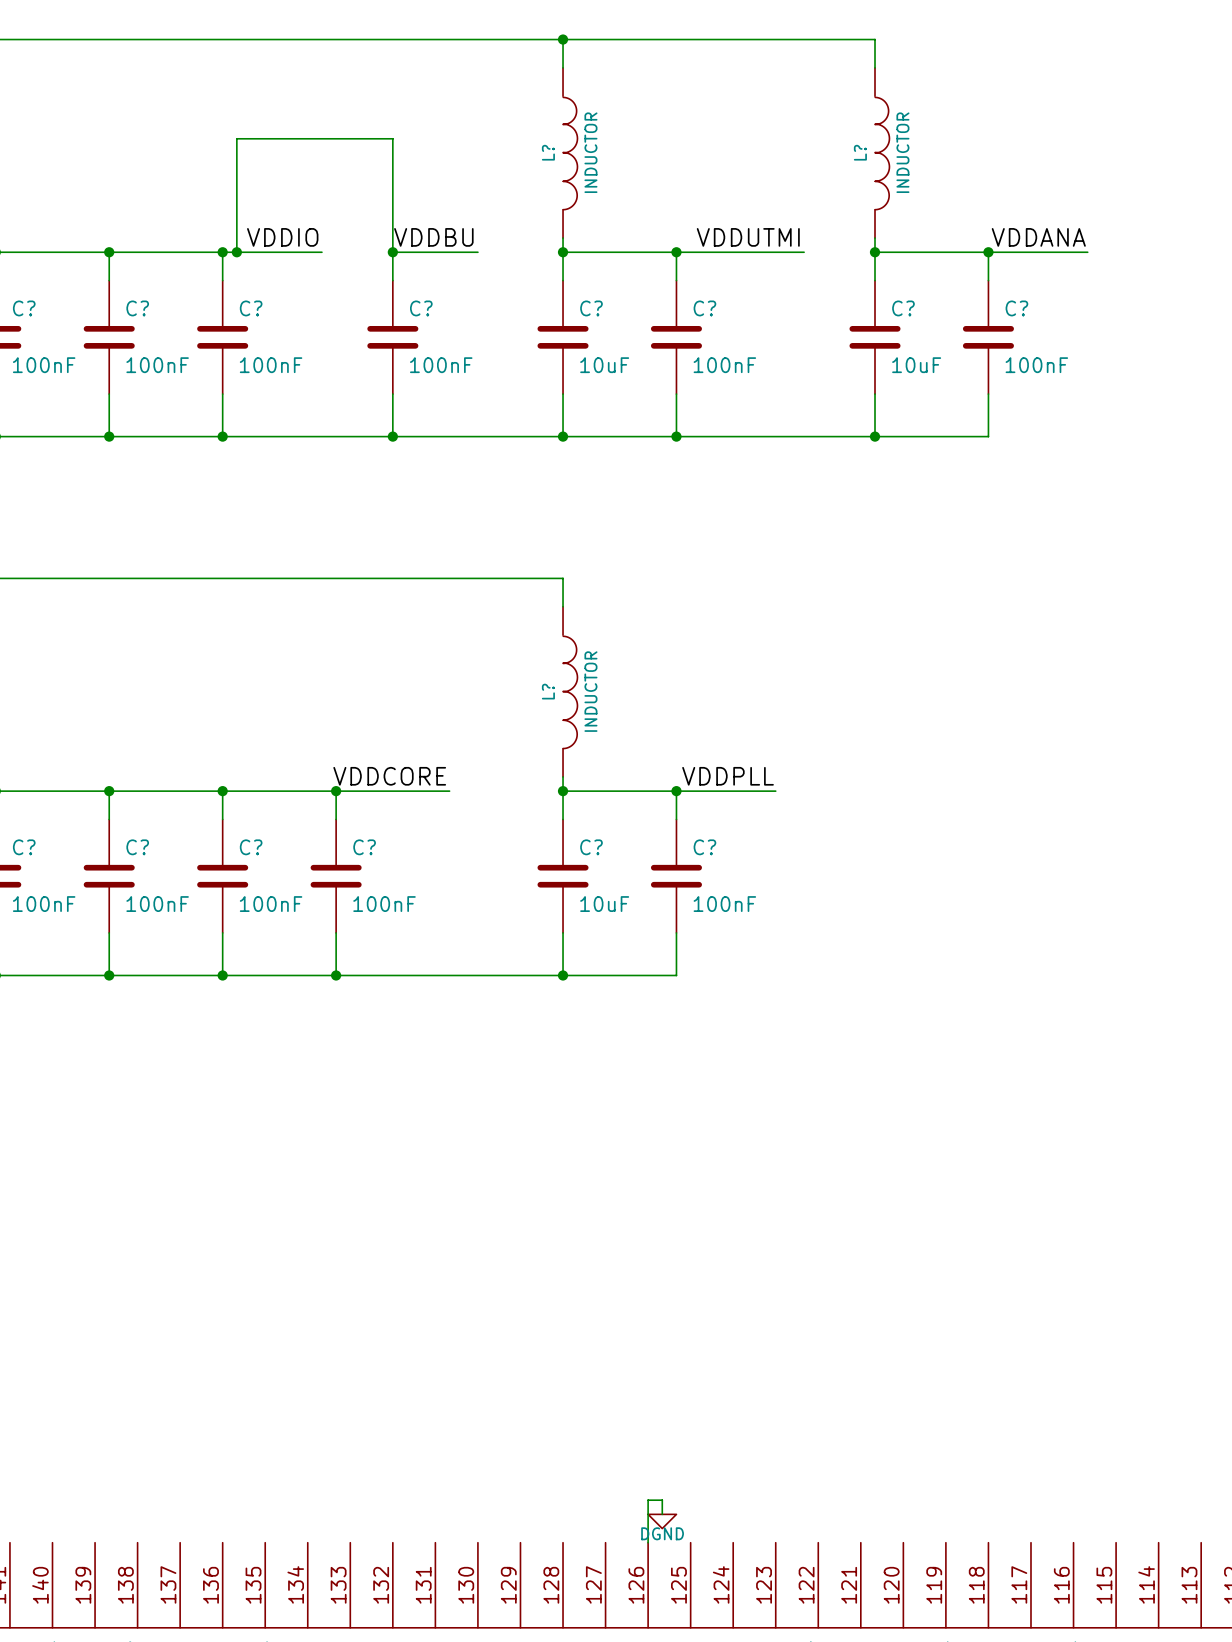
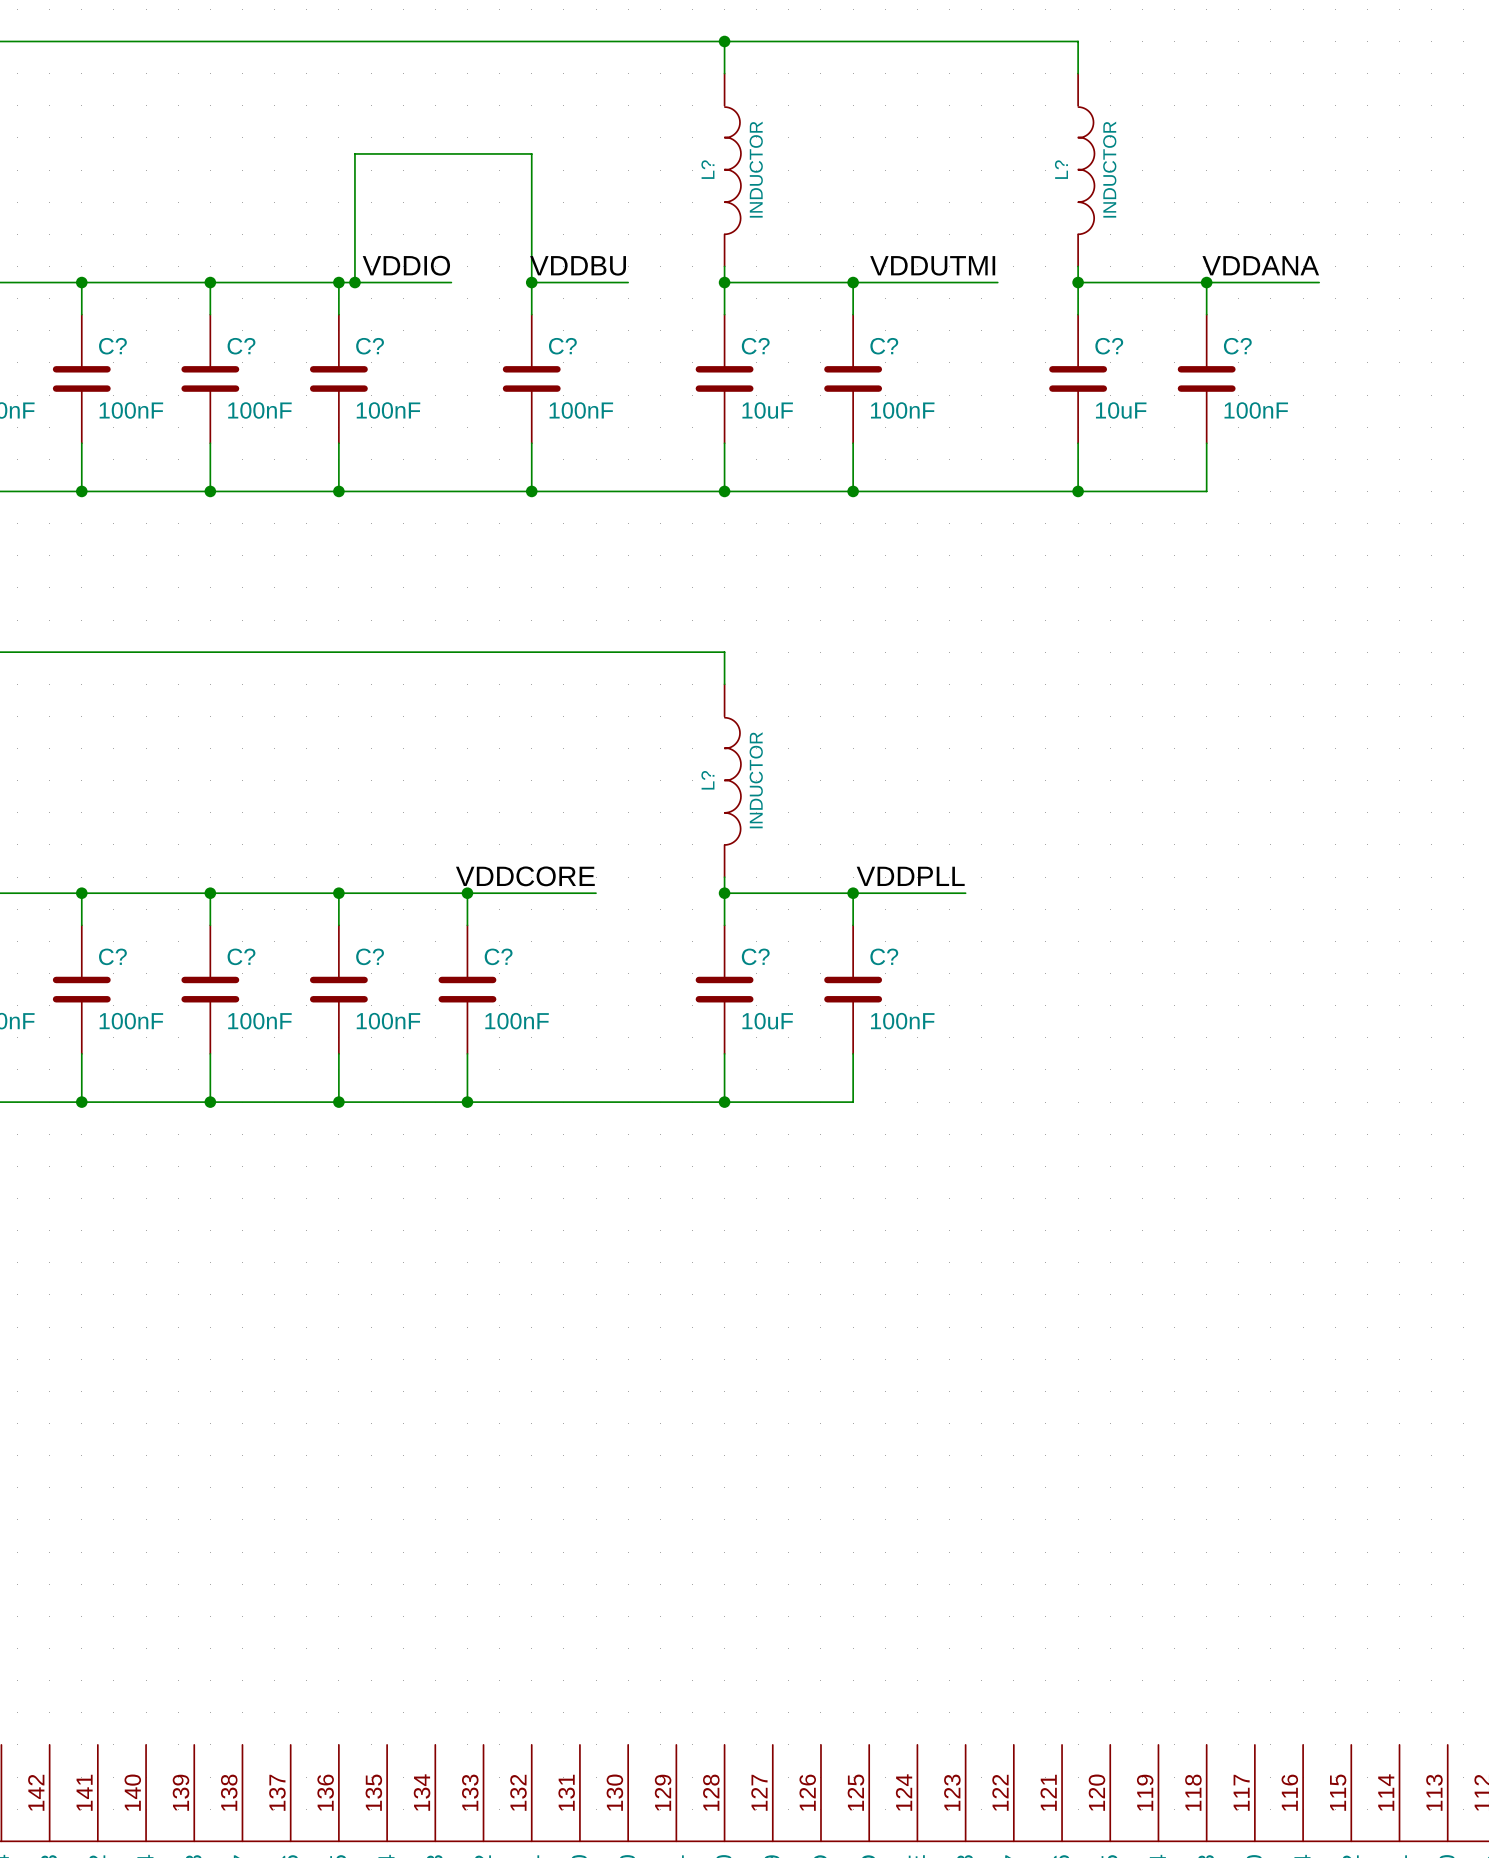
wire: (662, 1514) (662, 1500) (648, 1500) (648, 1542) -> none
power symbol: DGND (662, 1521) -> none

